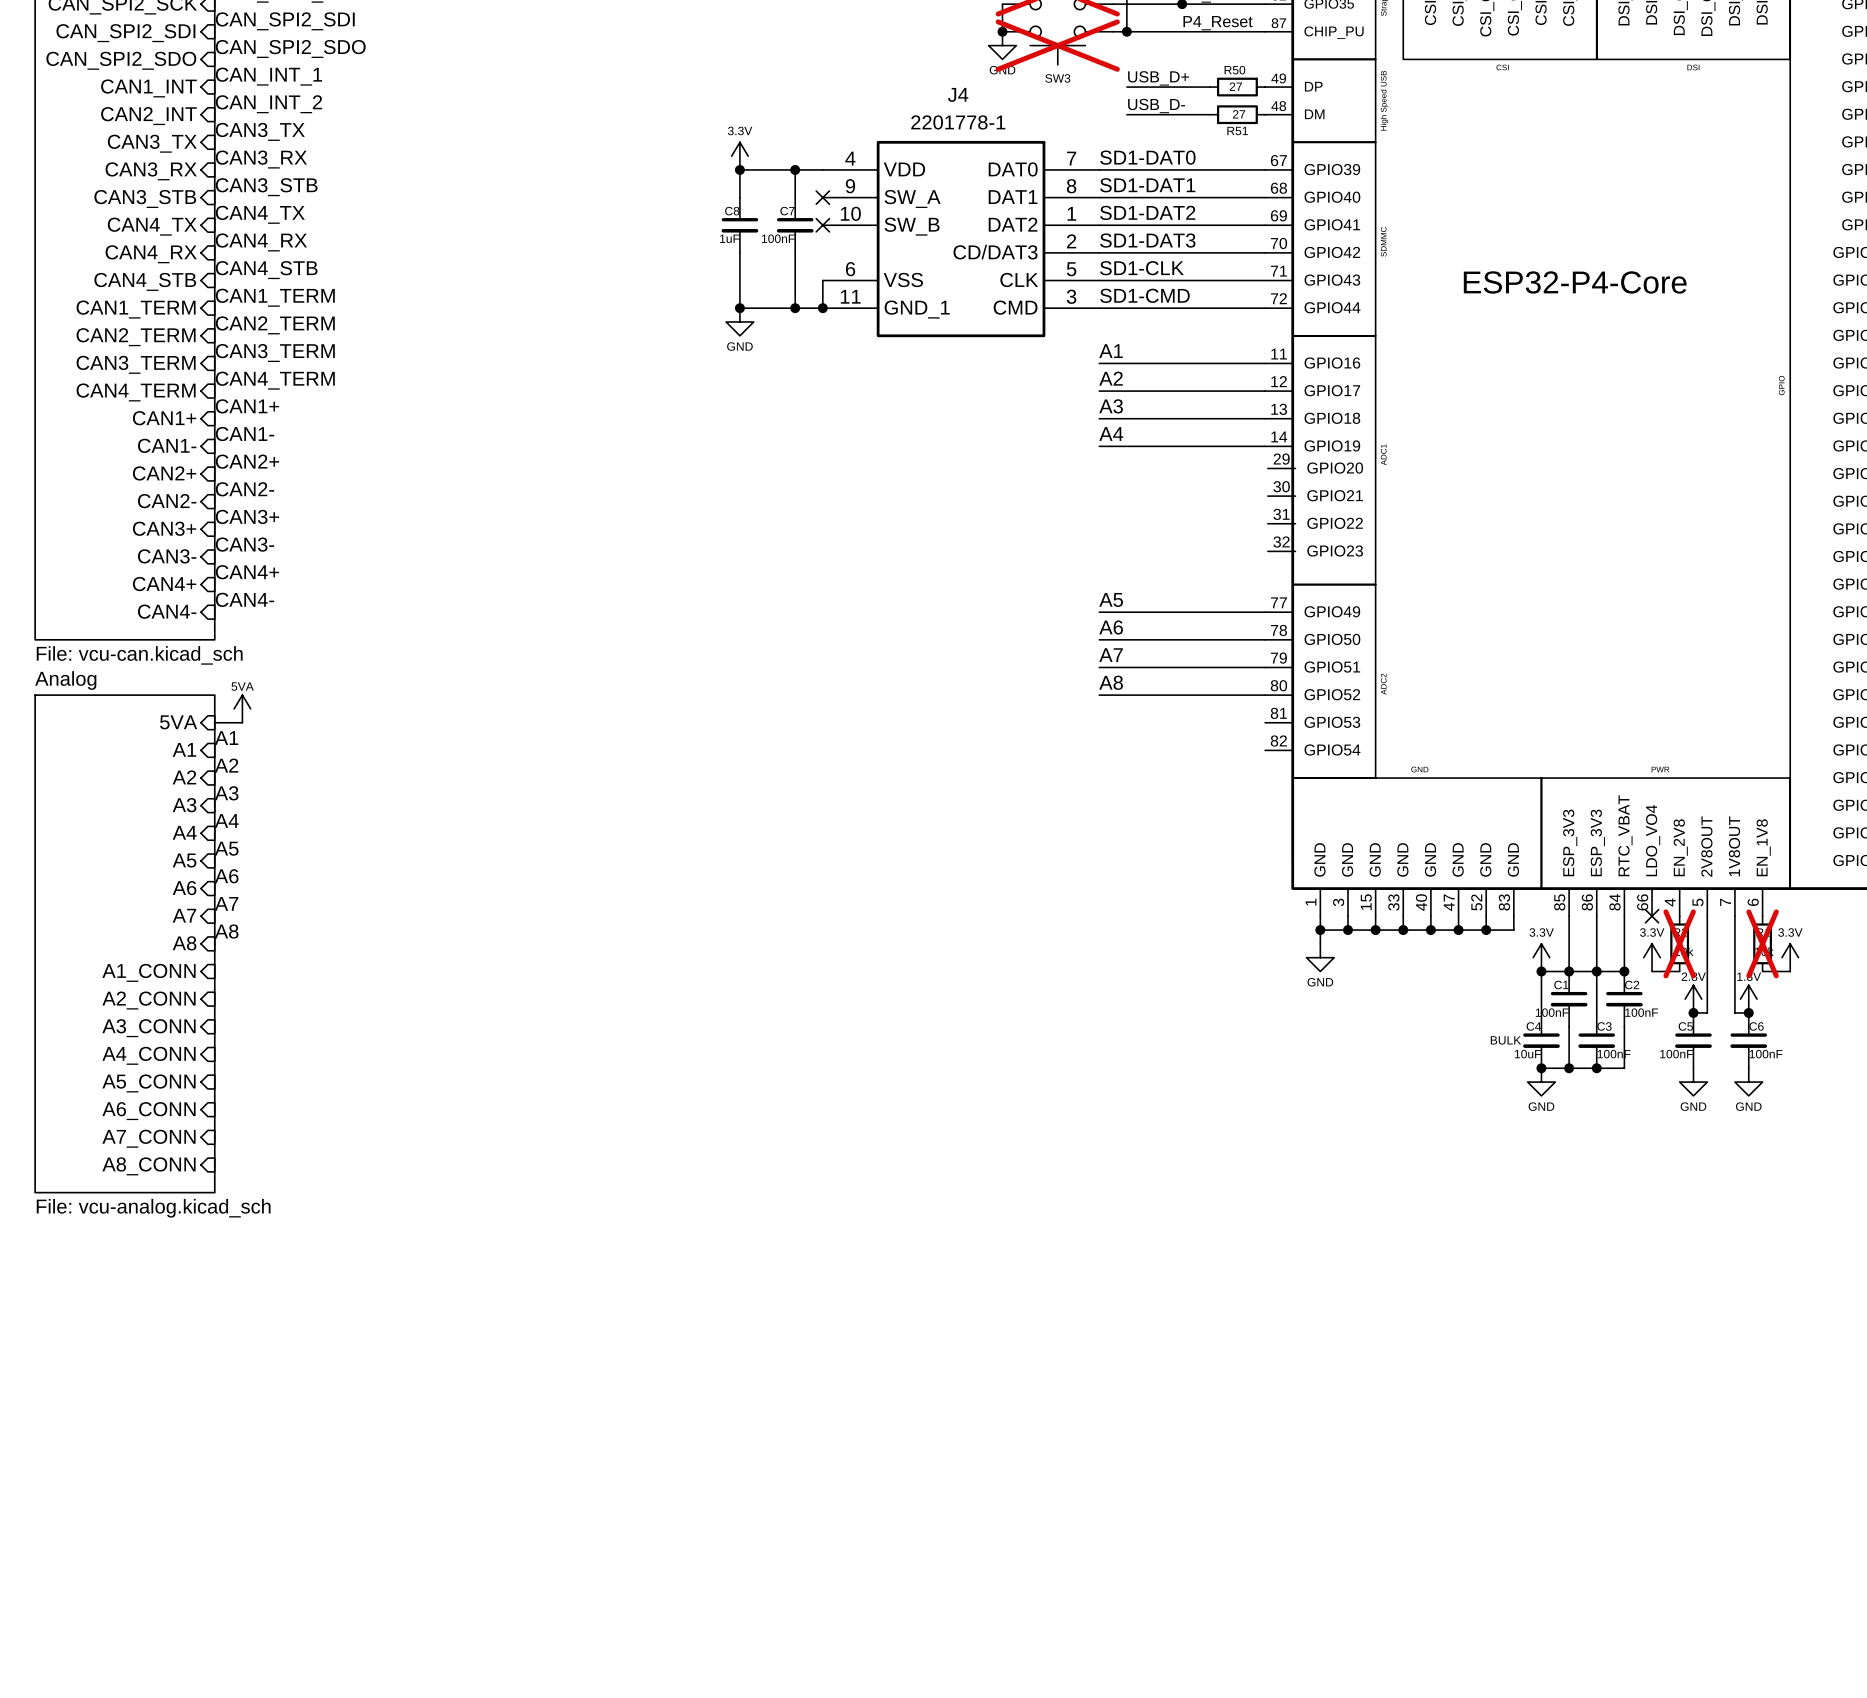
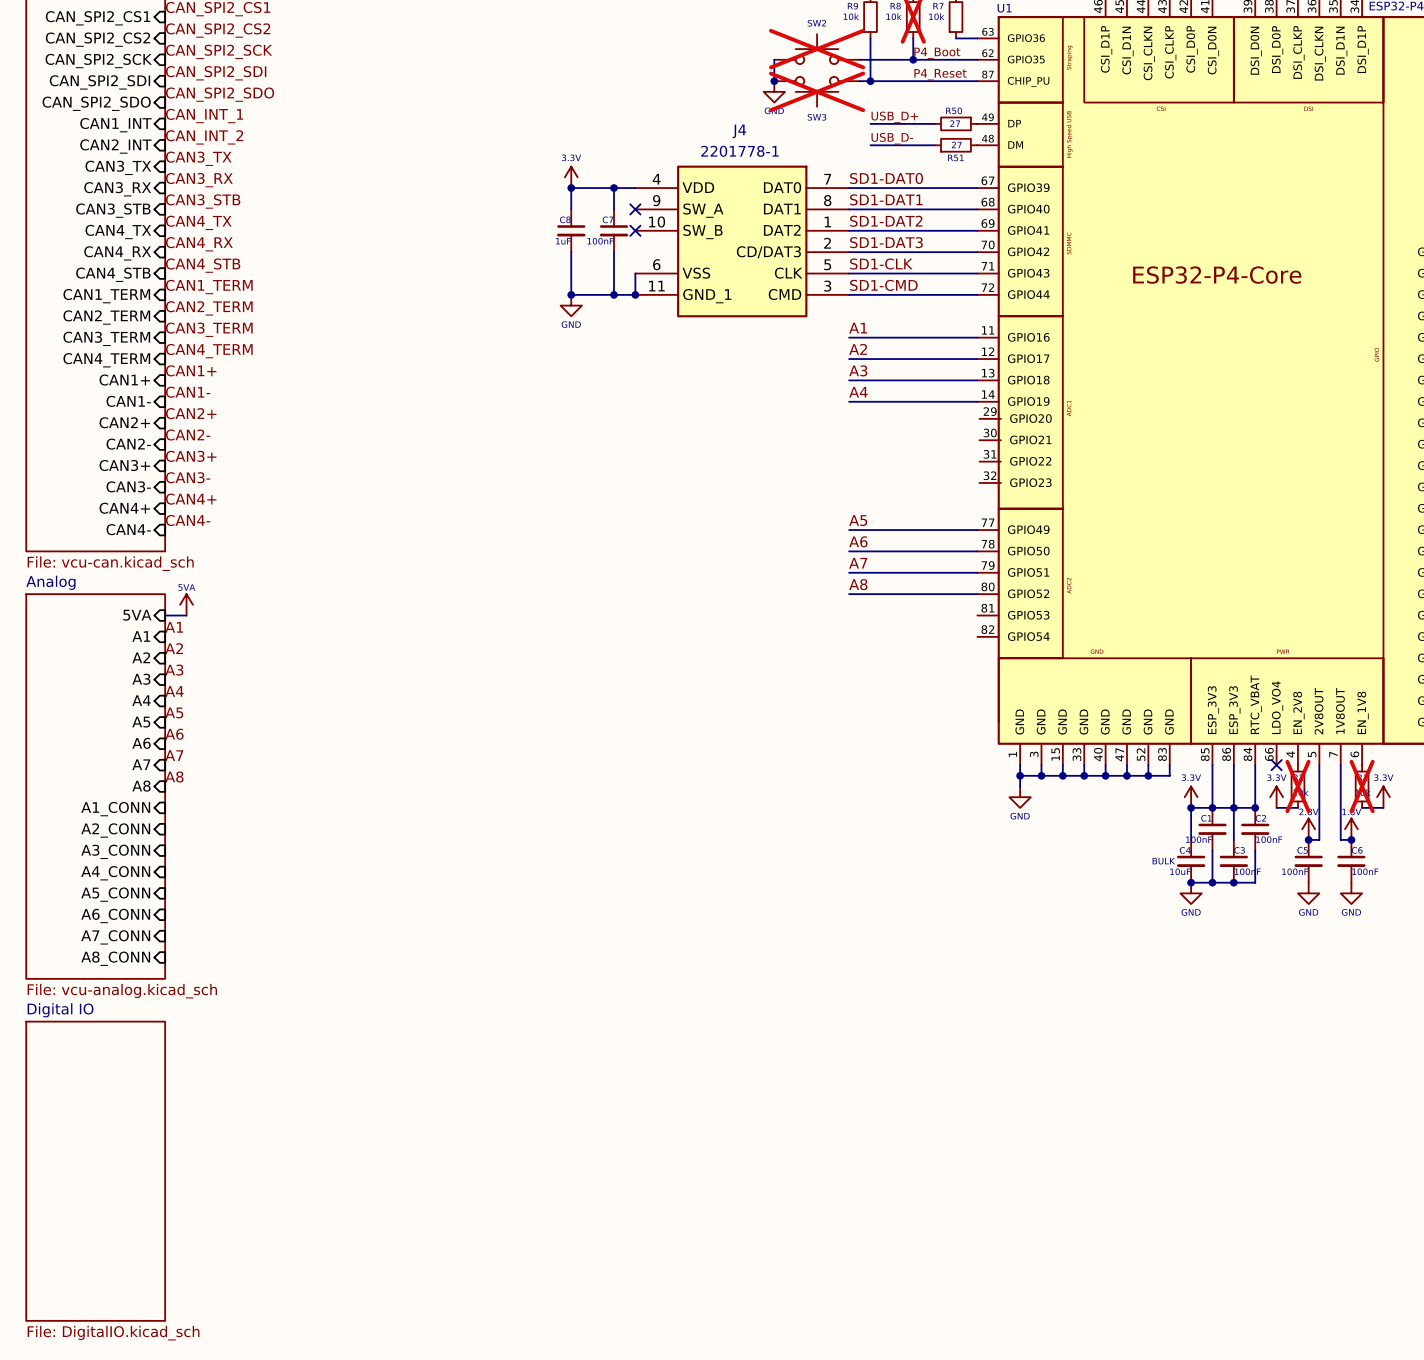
sheet Digital IO: none -> File: DigitalIO.kicad_sch (95, 1171)

